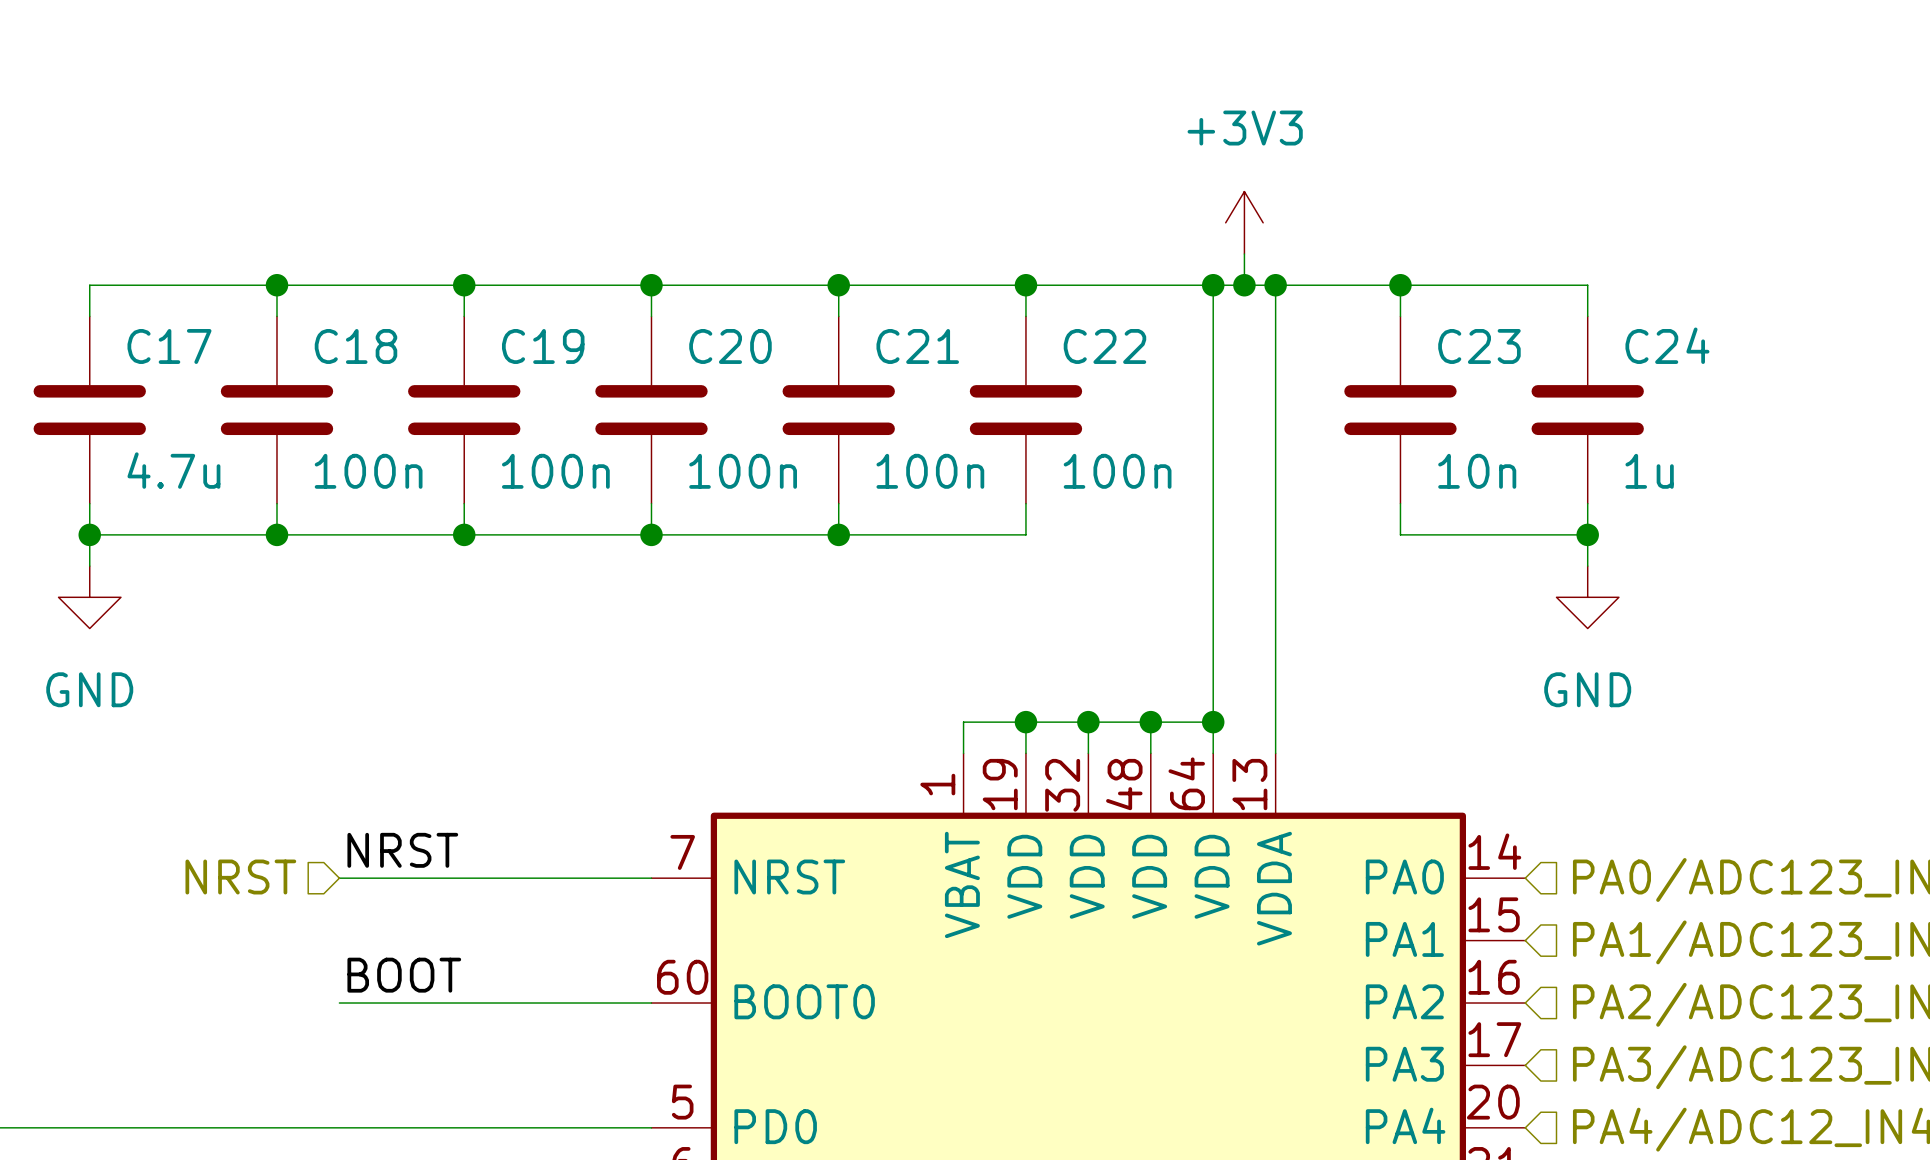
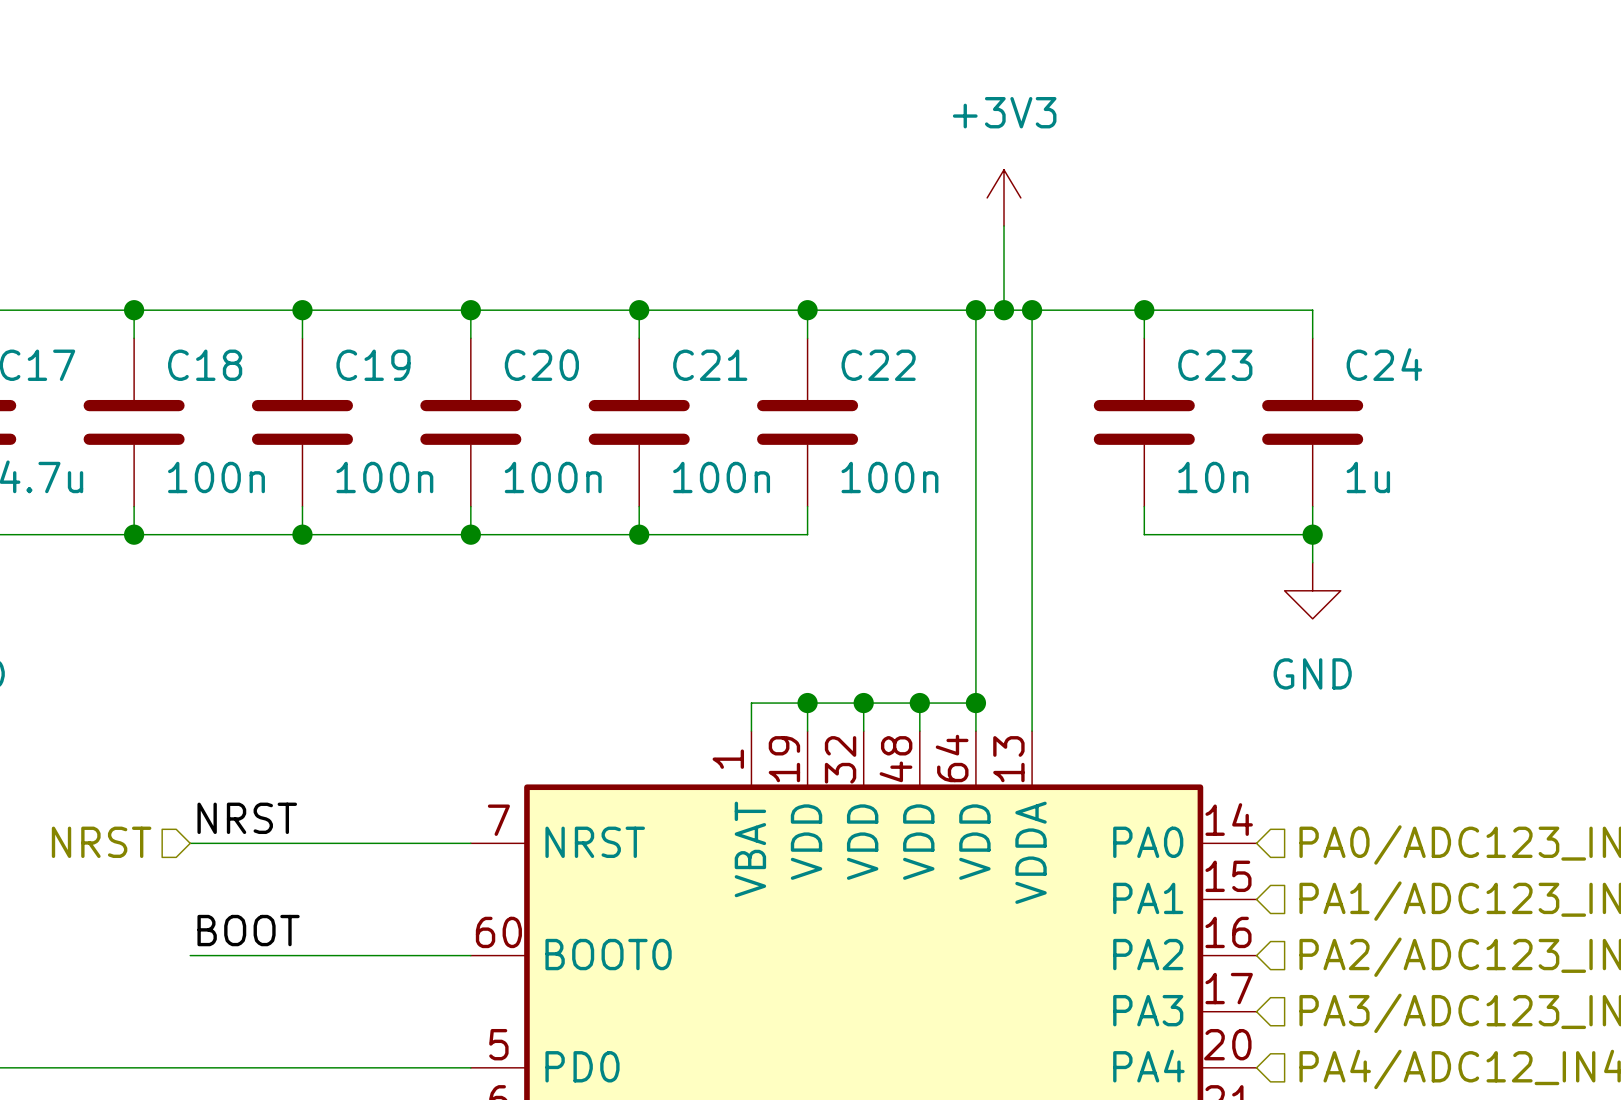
power symbol position: +3V3 (1244, 222) -> +3V3 (1004, 197)

